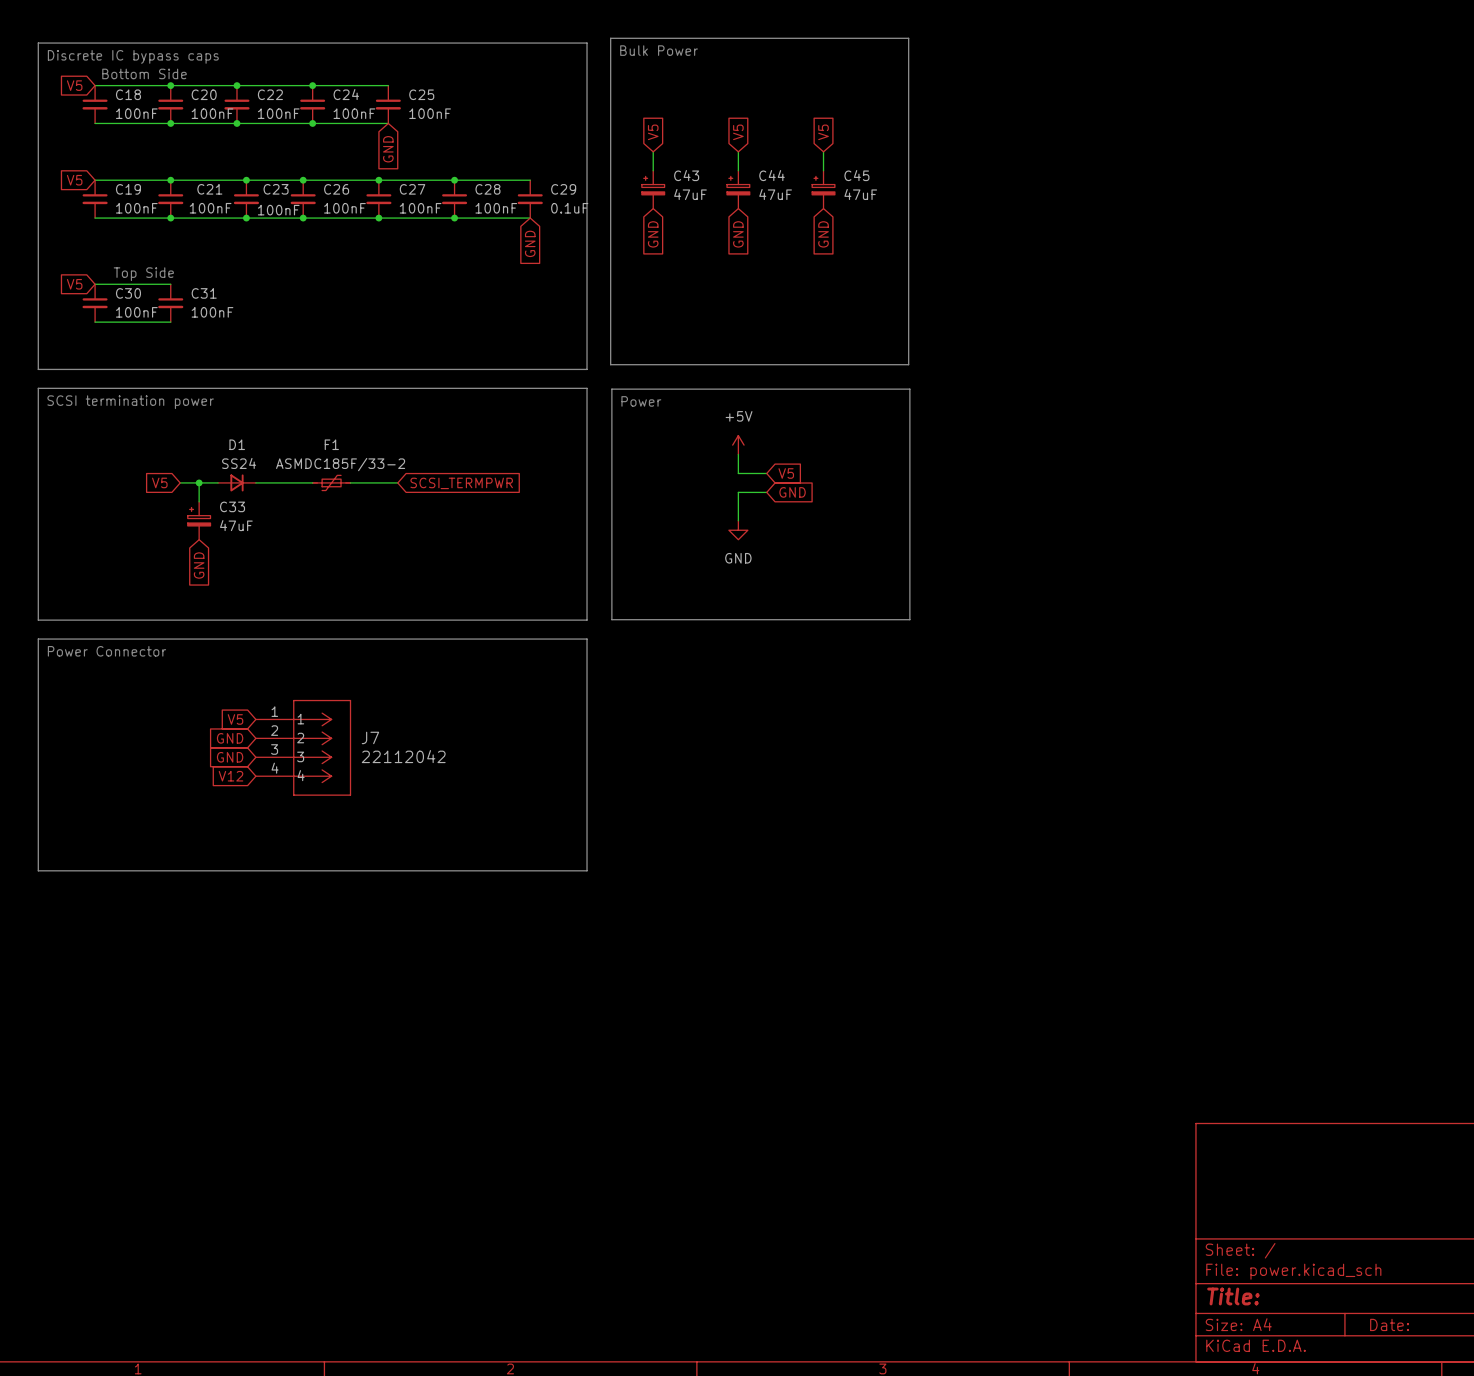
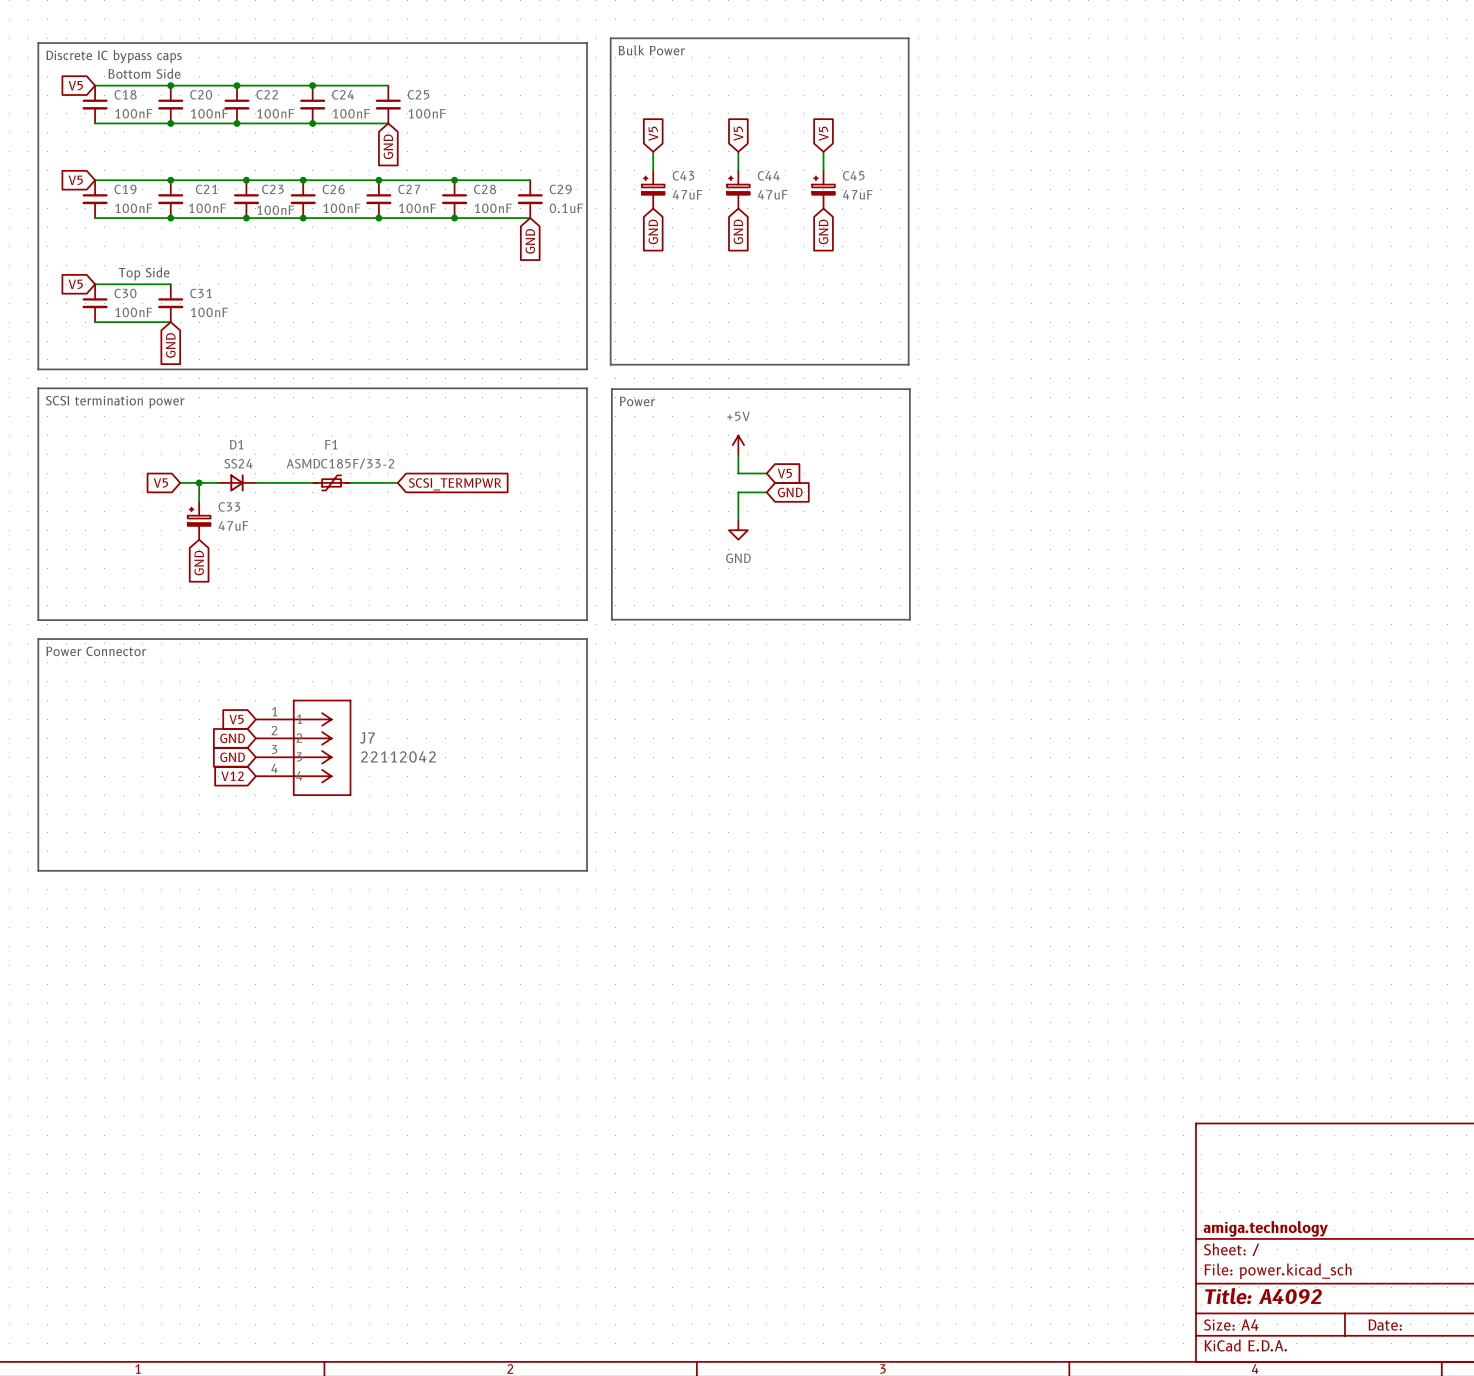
global label: none -> GND (170, 345)
title block: none -> amiga.technology (1265, 1228)
title block: Title: (1233, 1296) -> Title: A4092 (1263, 1296)

